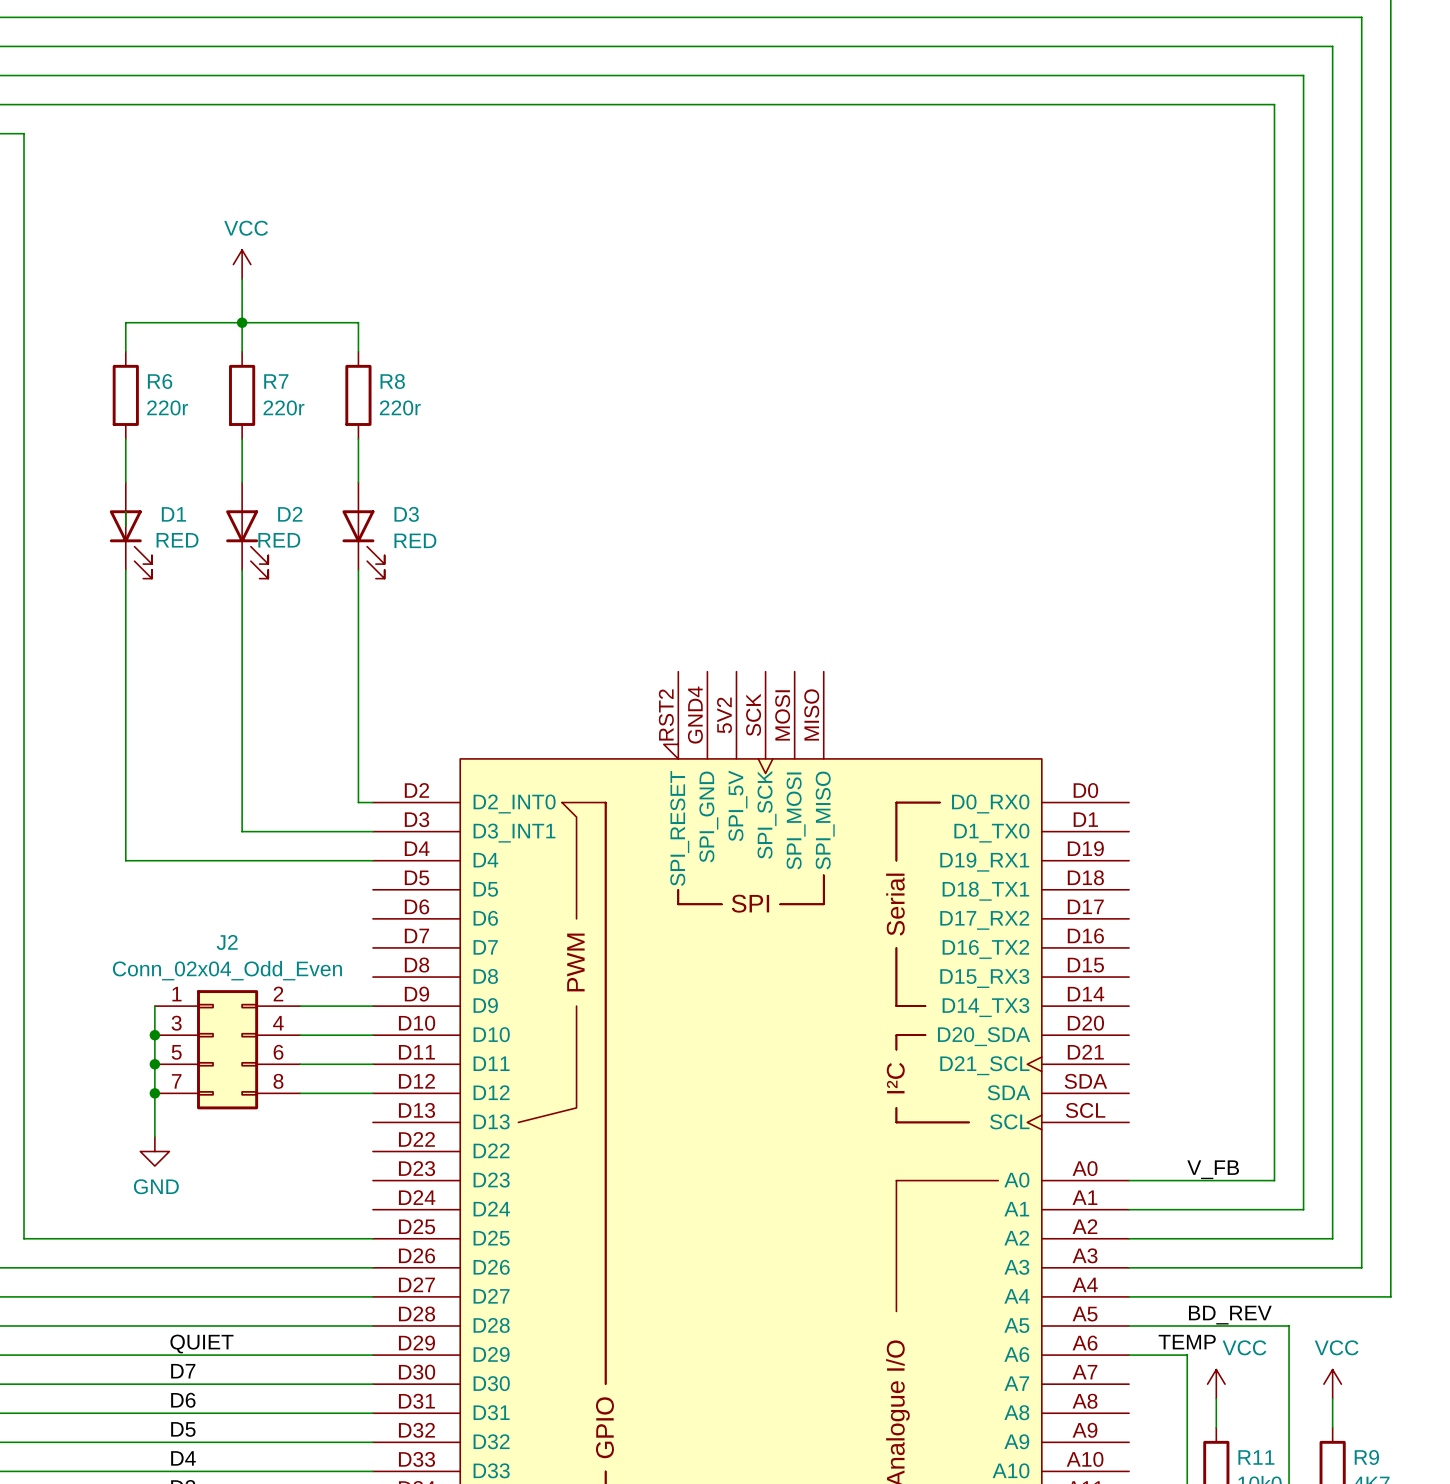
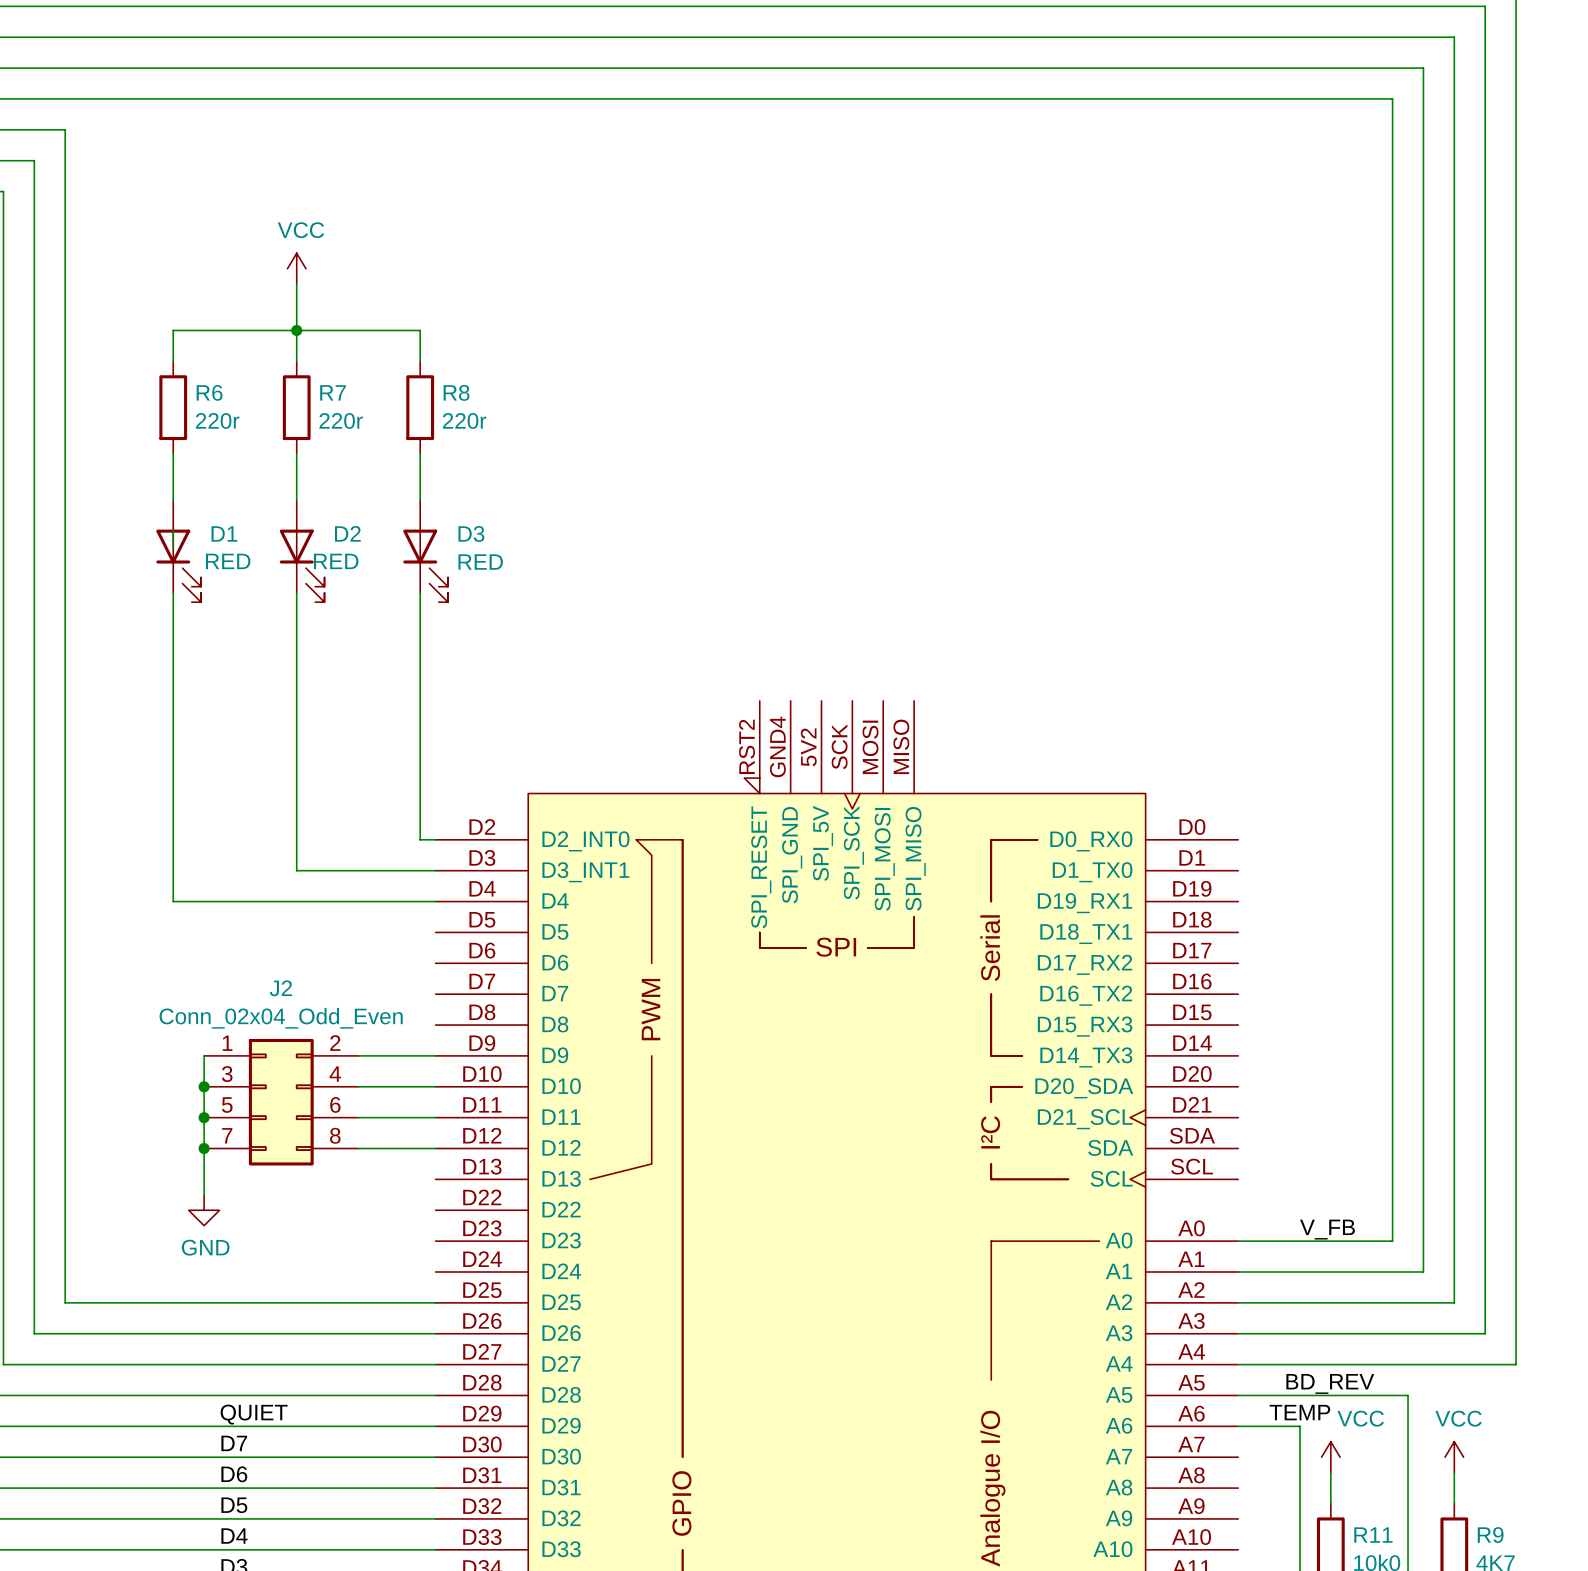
label position: BD_REV (1230, 1315) -> BD_REV (1330, 1383)

